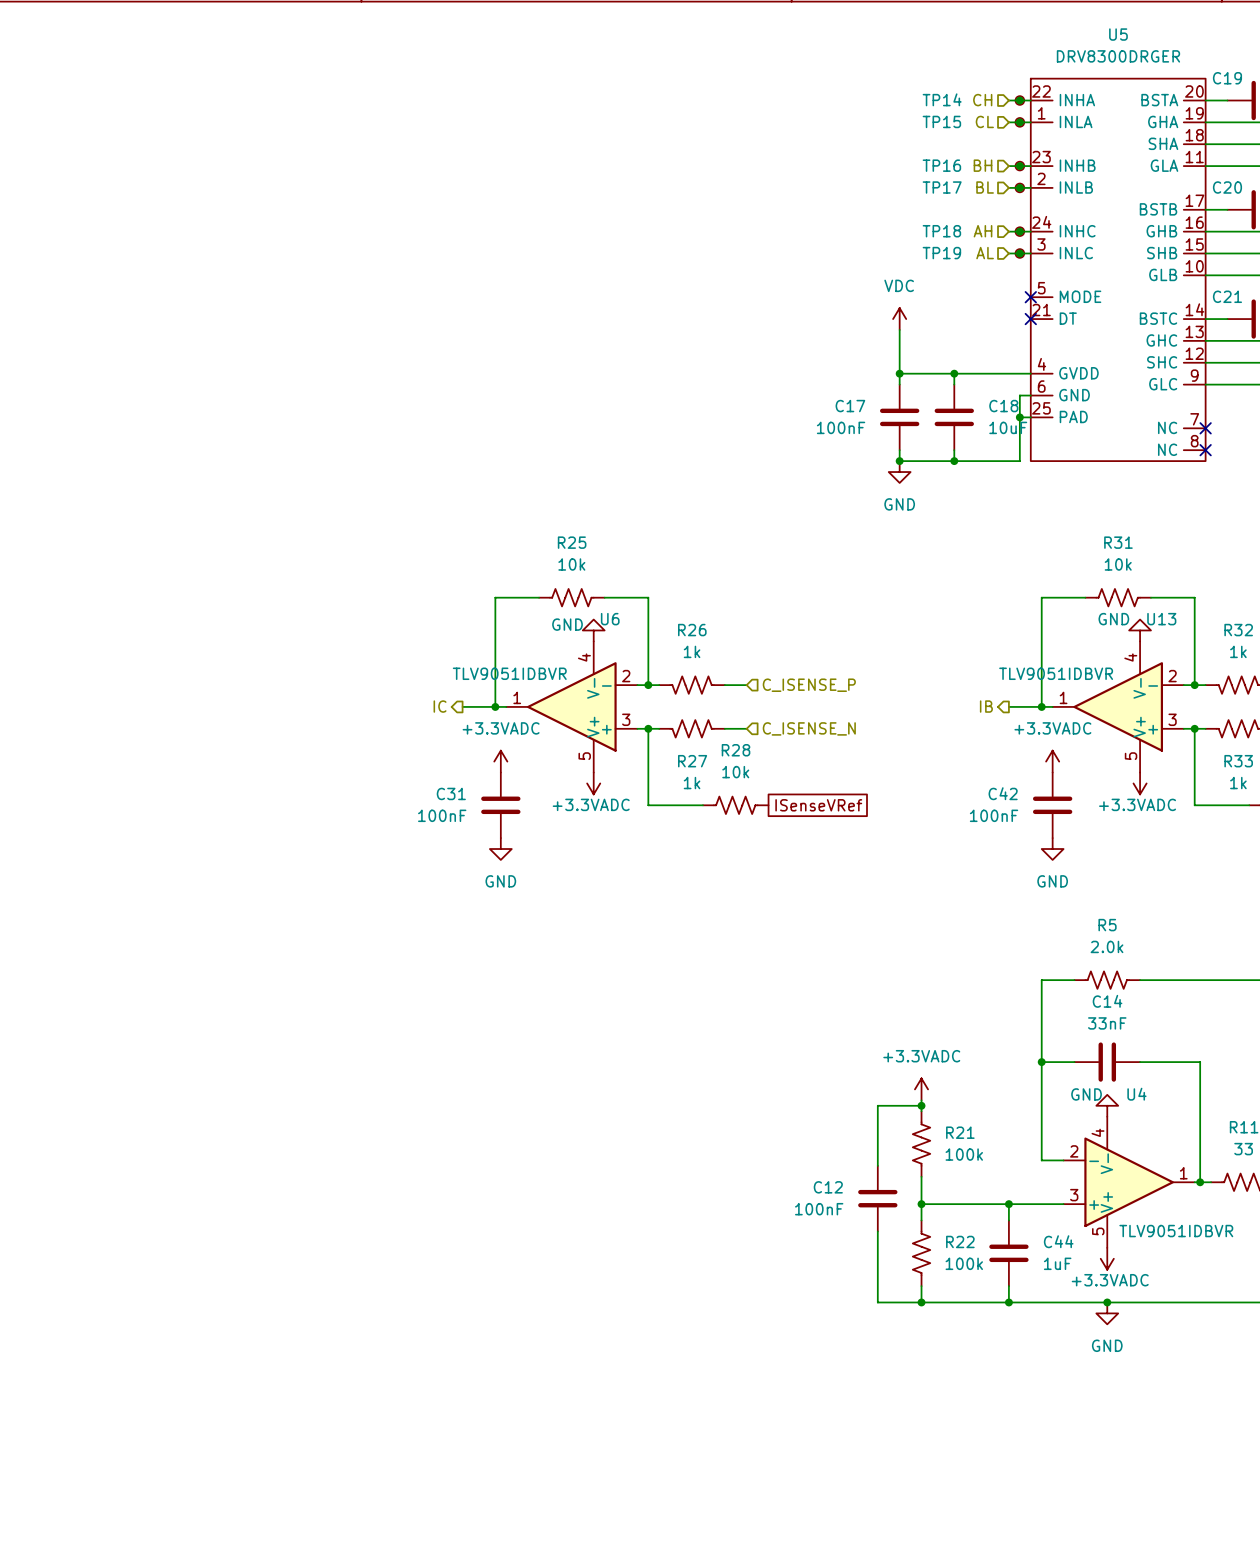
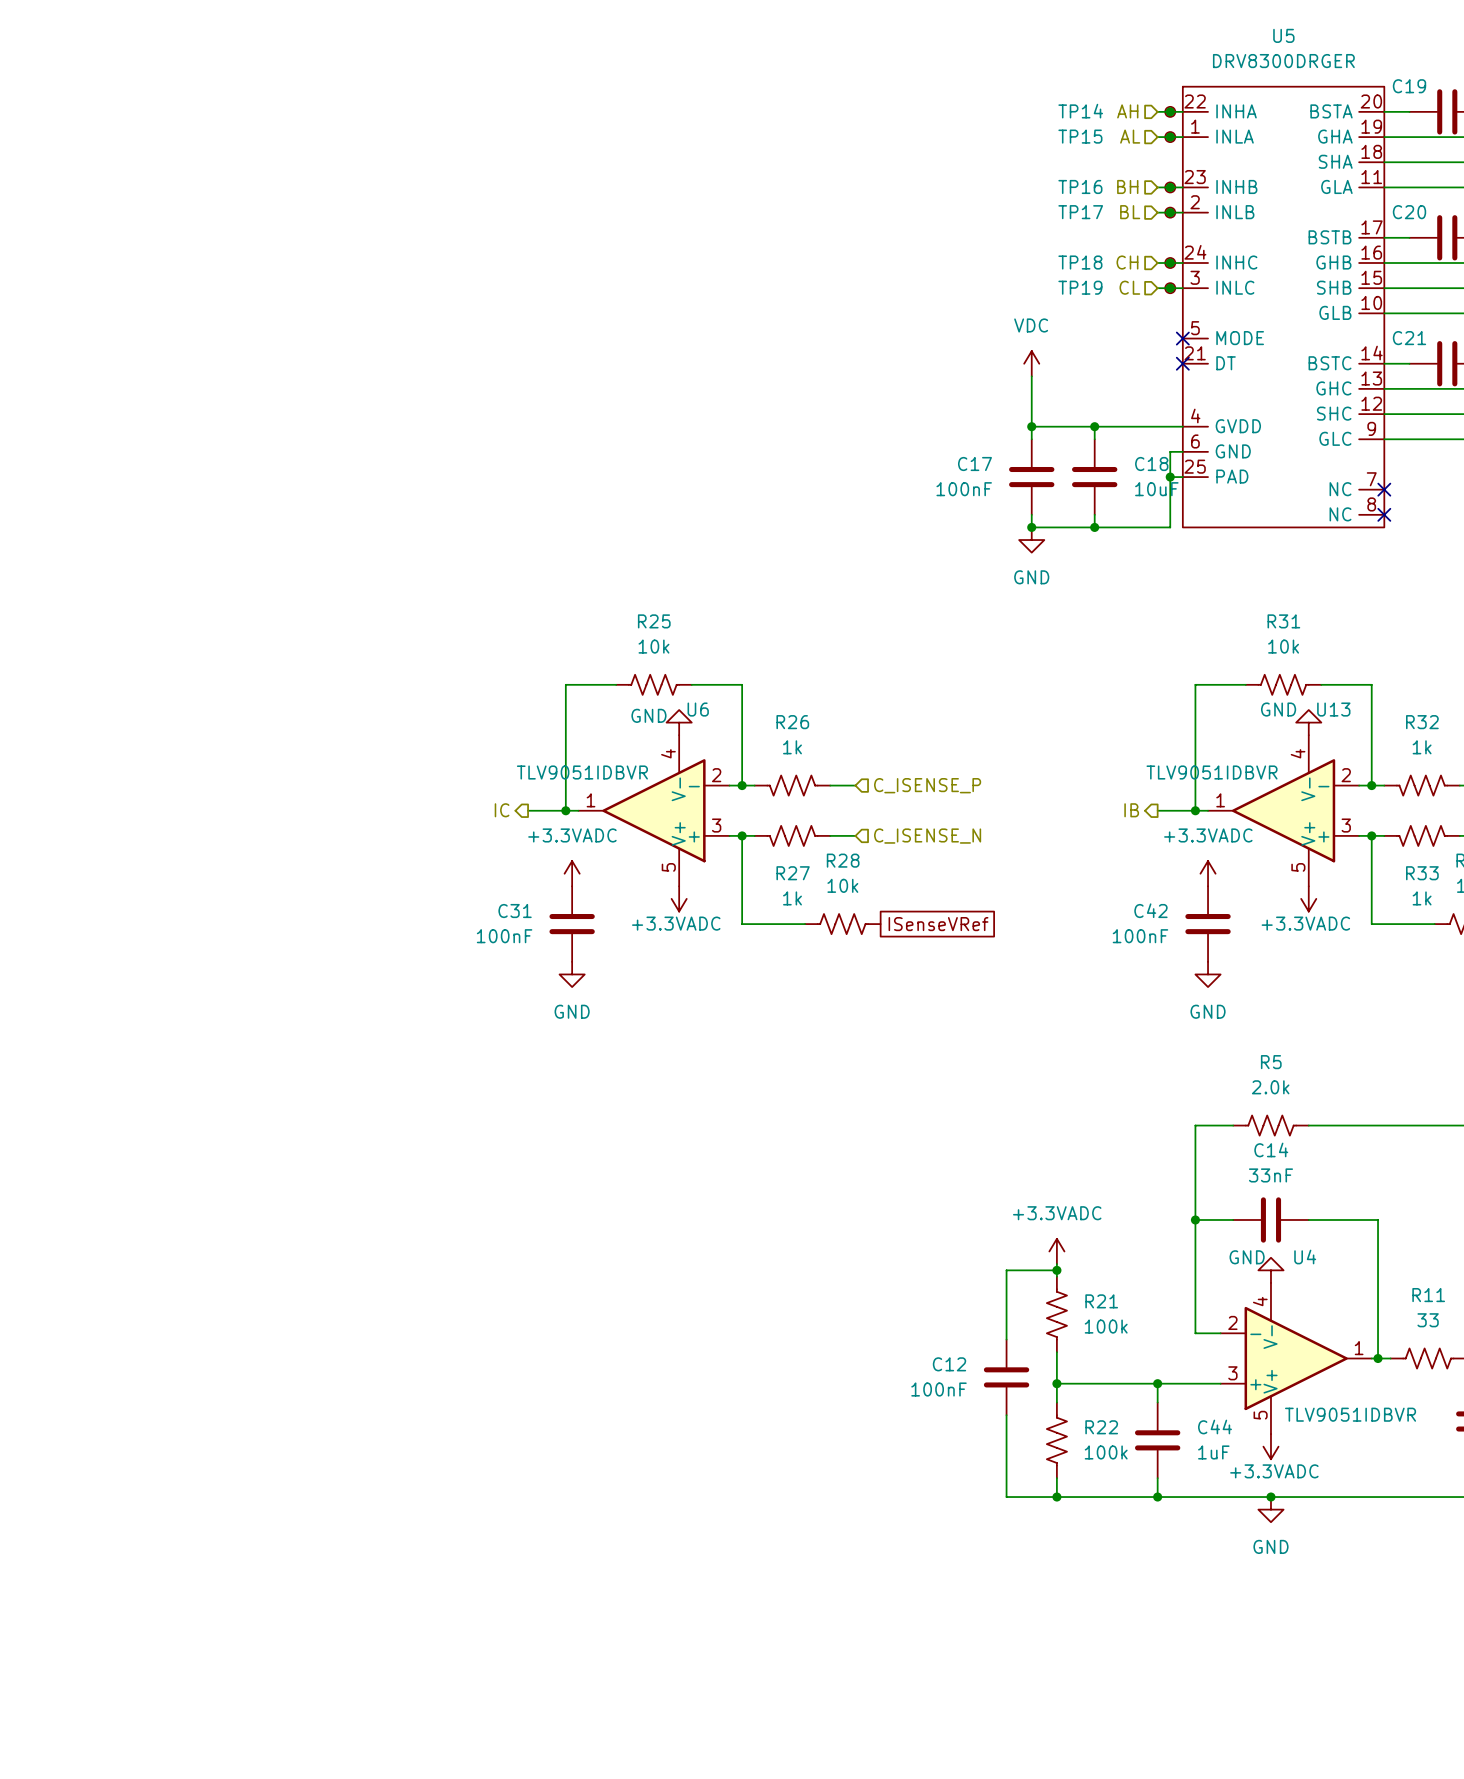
hierarchical label: CH (982, 100) -> AH (1127, 111)
hierarchical label: CL (984, 121) -> AL (1130, 136)
hierarchical label: AH (983, 231) -> CH (1127, 262)
hierarchical label: AL (985, 253) -> CL (1129, 287)

